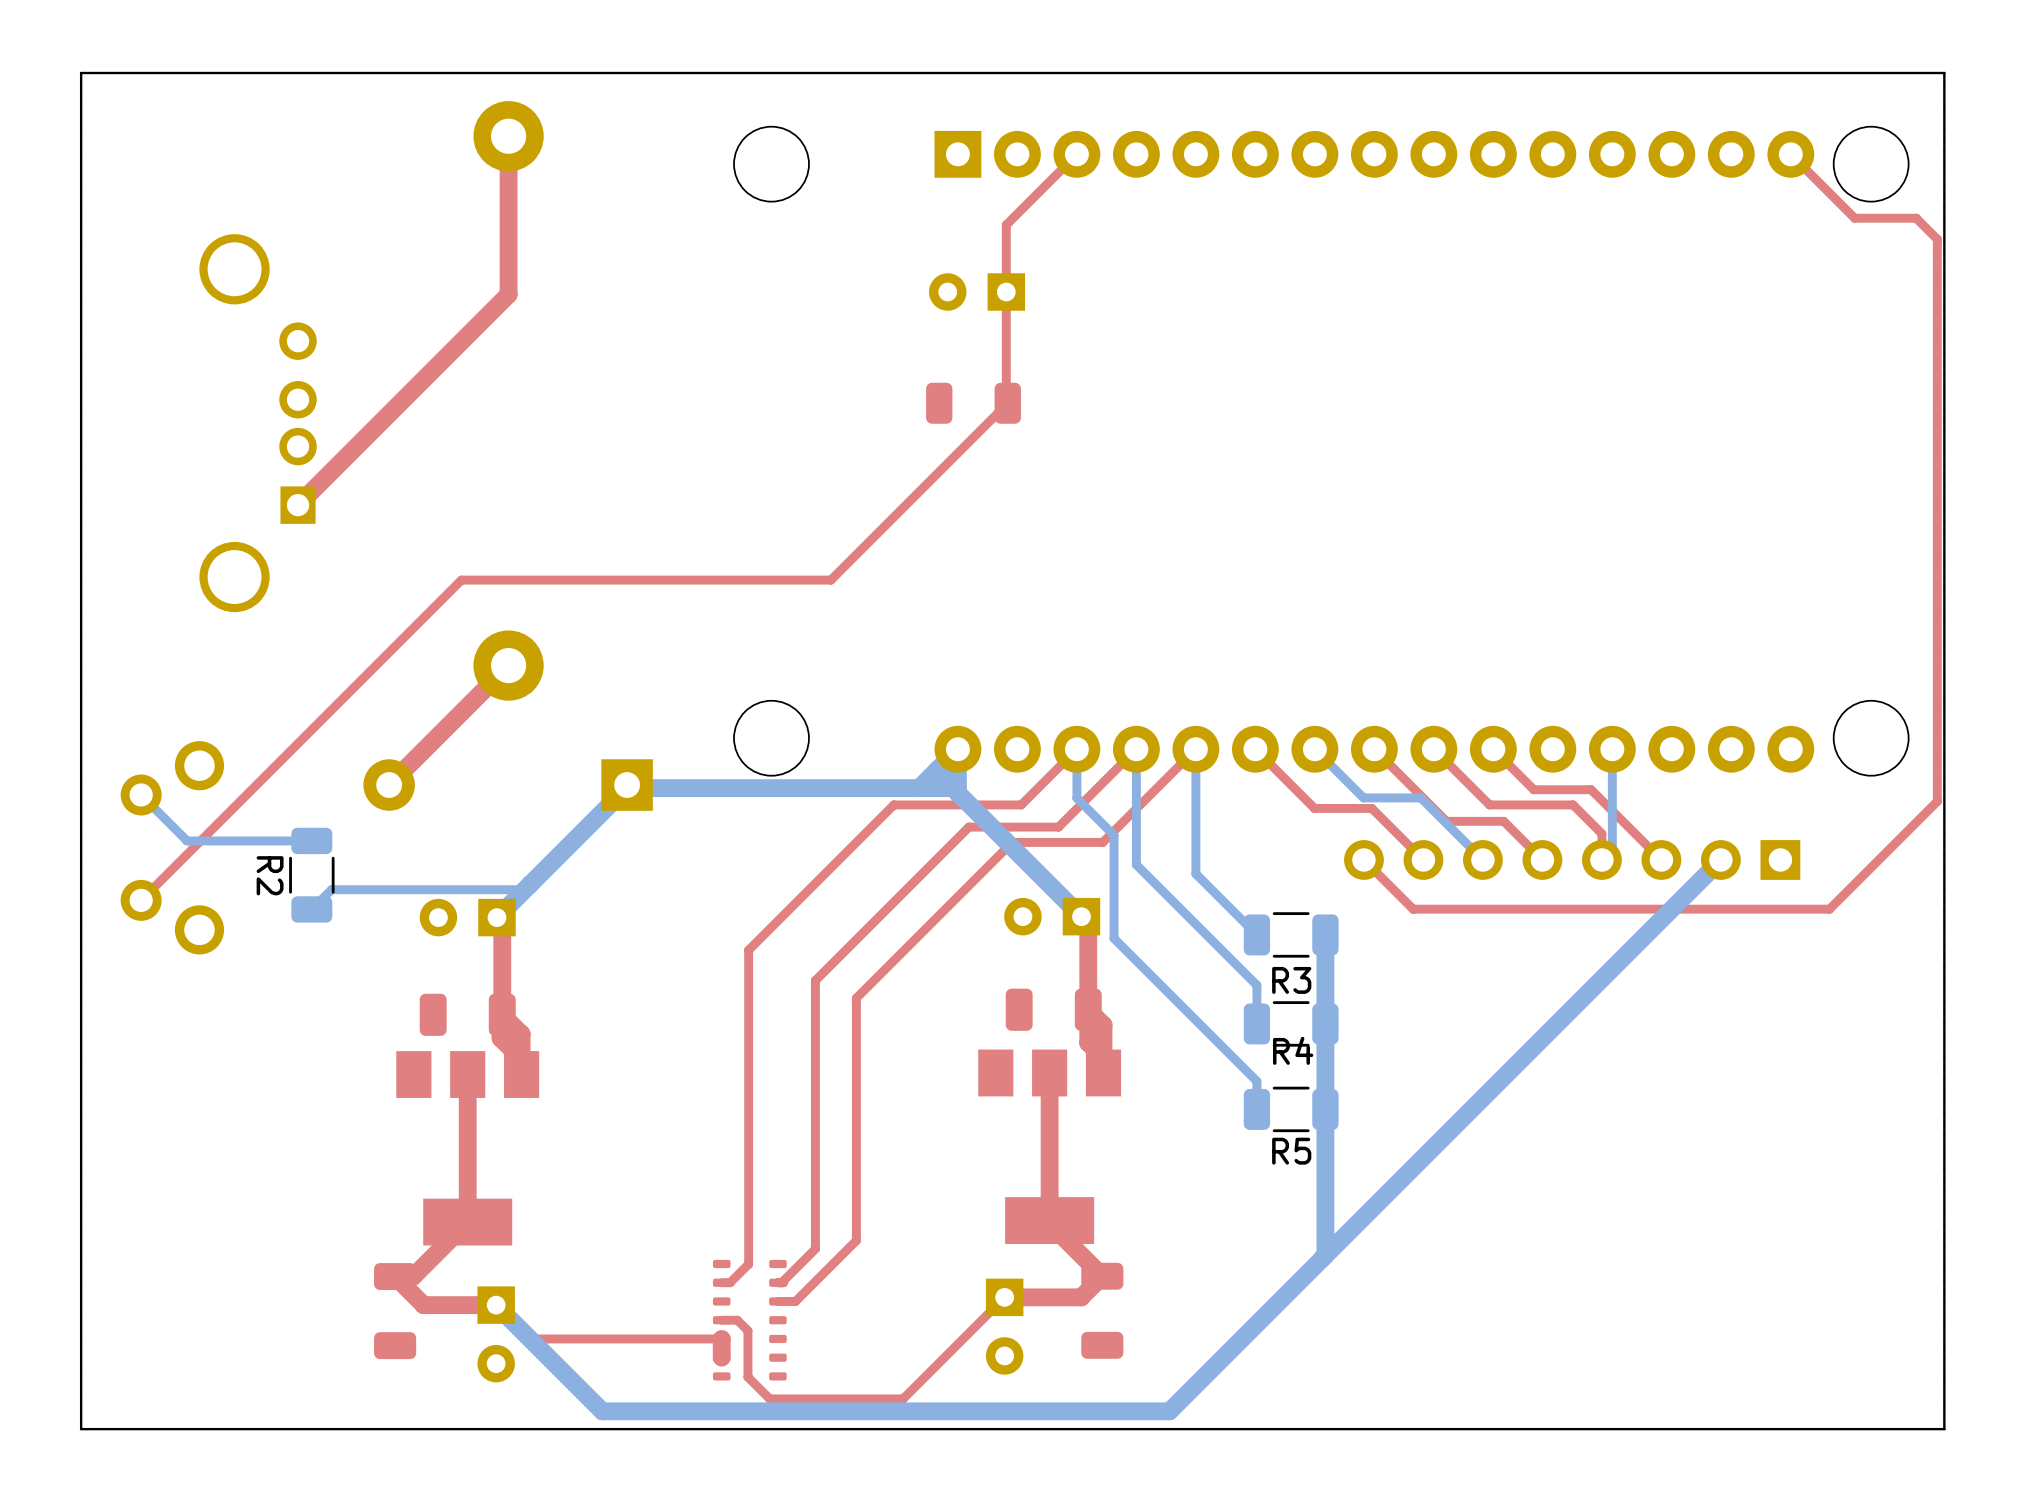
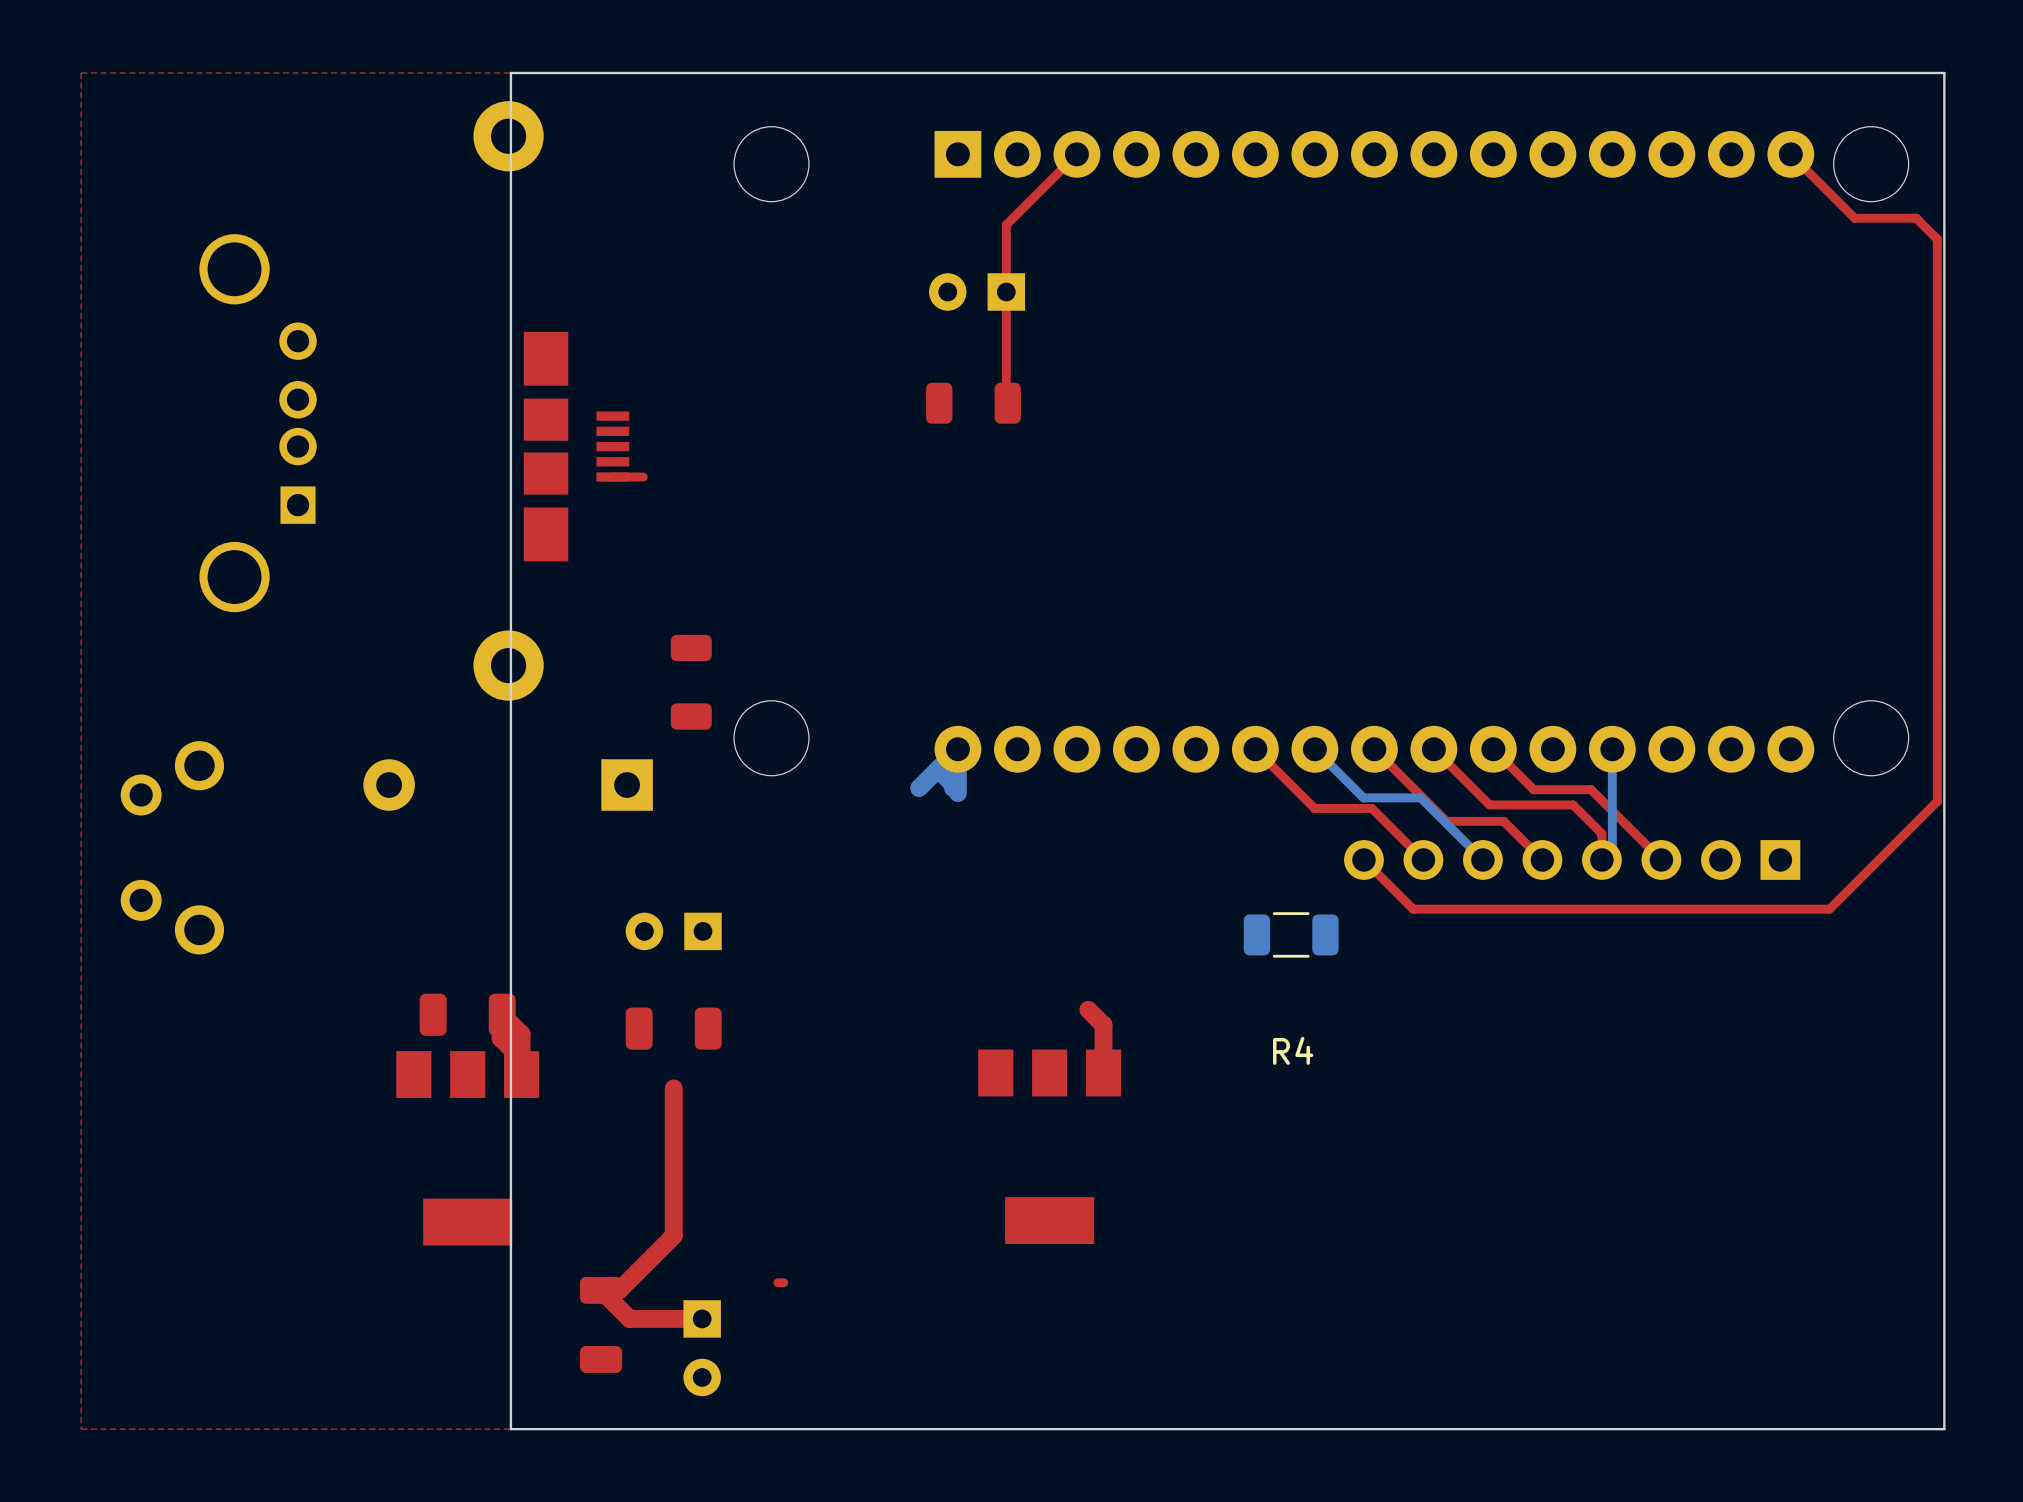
board edge: (510, 73) (81, 73) (81, 1429) (510, 1429) -> (510, 73) (510, 1429)
top track: (508, 136) (508, 294) (298, 505) -> none
top track: (1007, 403) (830, 580) (461, 580) (141, 900) -> none
part: none -> (576, 446)
top track: none -> (643, 477) (612, 477)
top track: (508, 665) (389, 785) -> none
top track: (1076, 749) (1021, 804) (893, 804) (748, 950) (748, 1264) (730, 1282) (721, 1282) -> none
bottom track: (1076, 749) (1076, 798) (1114, 835) (1114, 938) (1256, 1081) (1256, 1109) -> none
top track: (1136, 749) (1058, 827) (968, 827) (815, 980) (815, 1248) (781, 1282) -> none
bottom track: (1136, 749) (1136, 864) (1256, 985) (1256, 1023) -> none
top track: (1195, 749) (1102, 842) (1012, 842) (856, 998) (856, 1240) (795, 1301) (777, 1301) -> none
bottom track: (1195, 749) (1195, 873) (1256, 934) -> none
bottom track: (141, 794) (187, 840) (311, 840) -> none
bottom track: (1720, 859) (1169, 1411) (602, 1411) (496, 1305) -> none
R2 side: bottom (311, 875) -> top (691, 682)
bottom track: (530, 884) (524, 889) (331, 889) (311, 909) -> none
part: (1052, 916) -> none
top track: (1081, 916) (1088, 923) (1088, 1042) (1092, 1047) -> none
bottom track: (1081, 916) (952, 788) (630, 788) (627, 785) (627, 787) (496, 917) -> none
part: (467, 917) -> none
top track: (496, 917) (502, 922) (502, 1014) -> none
part: none -> (673, 931)
bottom track: (1325, 934) (1325, 1255) -> none
part: (1053, 1009) -> none
R3: (1291, 1023) -> none
part: none -> (673, 1028)
top track: (1049, 1072) (1049, 1223) (1102, 1276) (1081, 1297) (1004, 1297) (903, 1398) (769, 1398) (747, 1377) (747, 1330) (737, 1320) (721, 1320) -> none
top track: (467, 1074) (467, 1222) (413, 1276) (395, 1276) (423, 1305) (496, 1305) (530, 1338) (721, 1338) (721, 1357) -> none
top track: none -> (673, 1088) (673, 1235) (619, 1290) (601, 1290) (629, 1318) (702, 1318)
R5: (1291, 1109) -> none
part: (1102, 1310) -> none
part: (395, 1311) -> none
part: (749, 1320) -> none
part: none -> (601, 1324)
part: (1004, 1326) -> none
part: (496, 1334) -> none
part: none -> (702, 1348)

